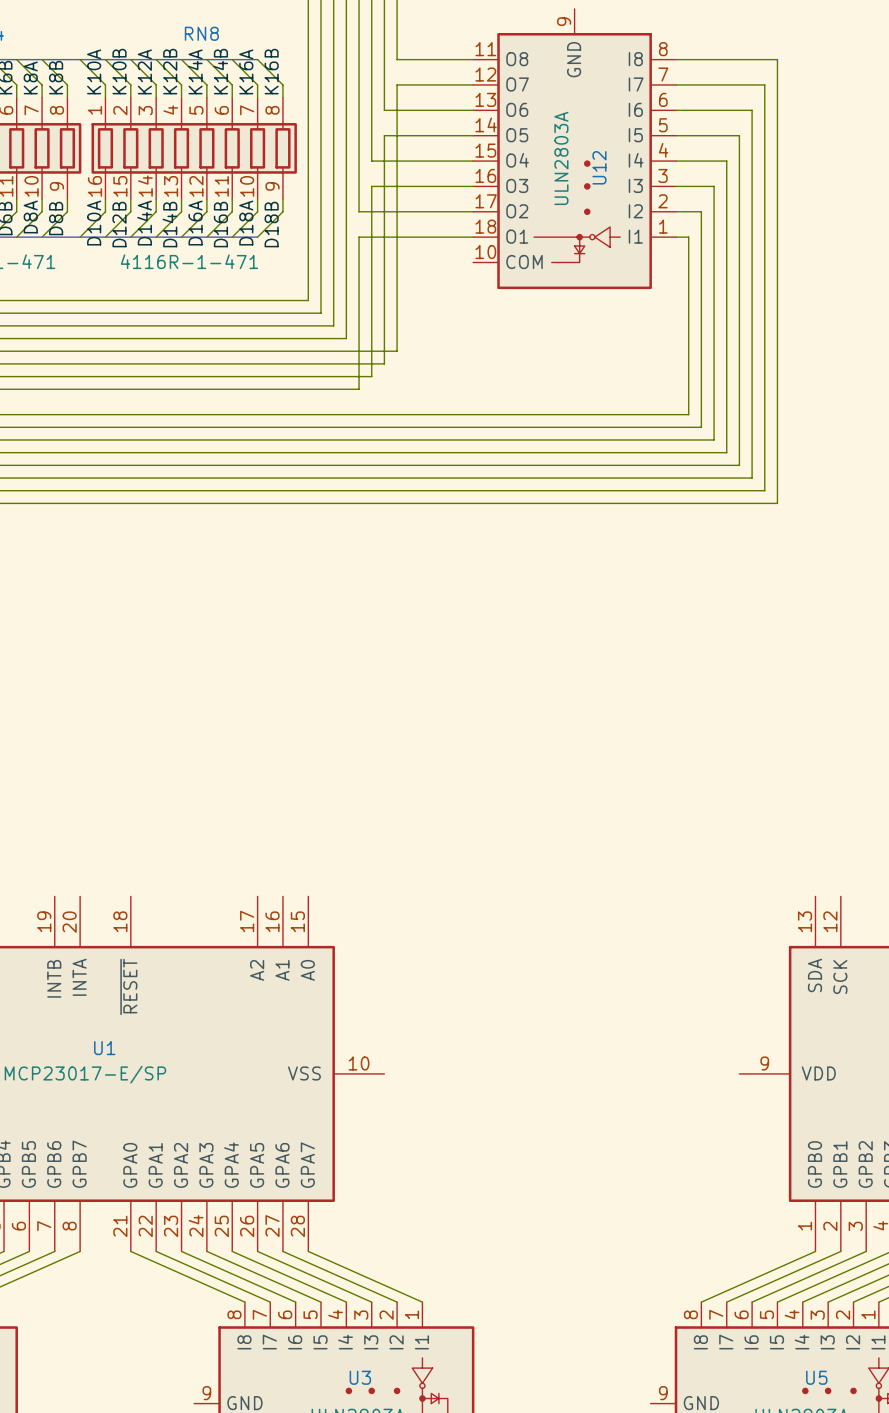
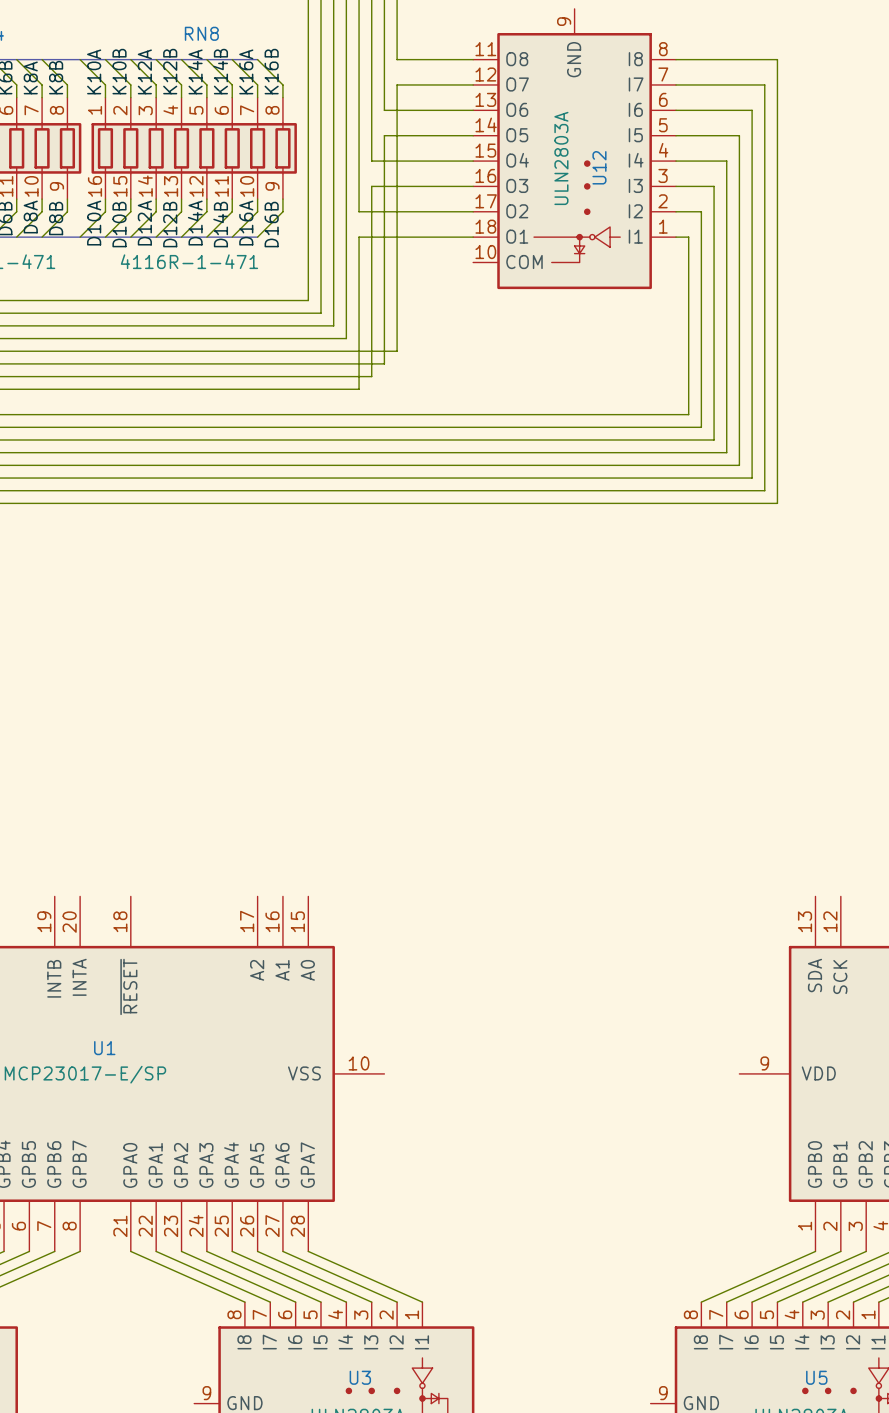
label: D14A (144, 223) -> D12A (144, 223)
label: D16A (195, 223) -> D14A (195, 223)
label: D18A (246, 223) -> D16A (246, 223)
label: D12B (119, 224) -> D10B (119, 224)
label: D14B (169, 224) -> D12B (170, 224)
label: D16B (220, 224) -> D14B (220, 224)
label: D18B (271, 224) -> D16B (271, 224)

